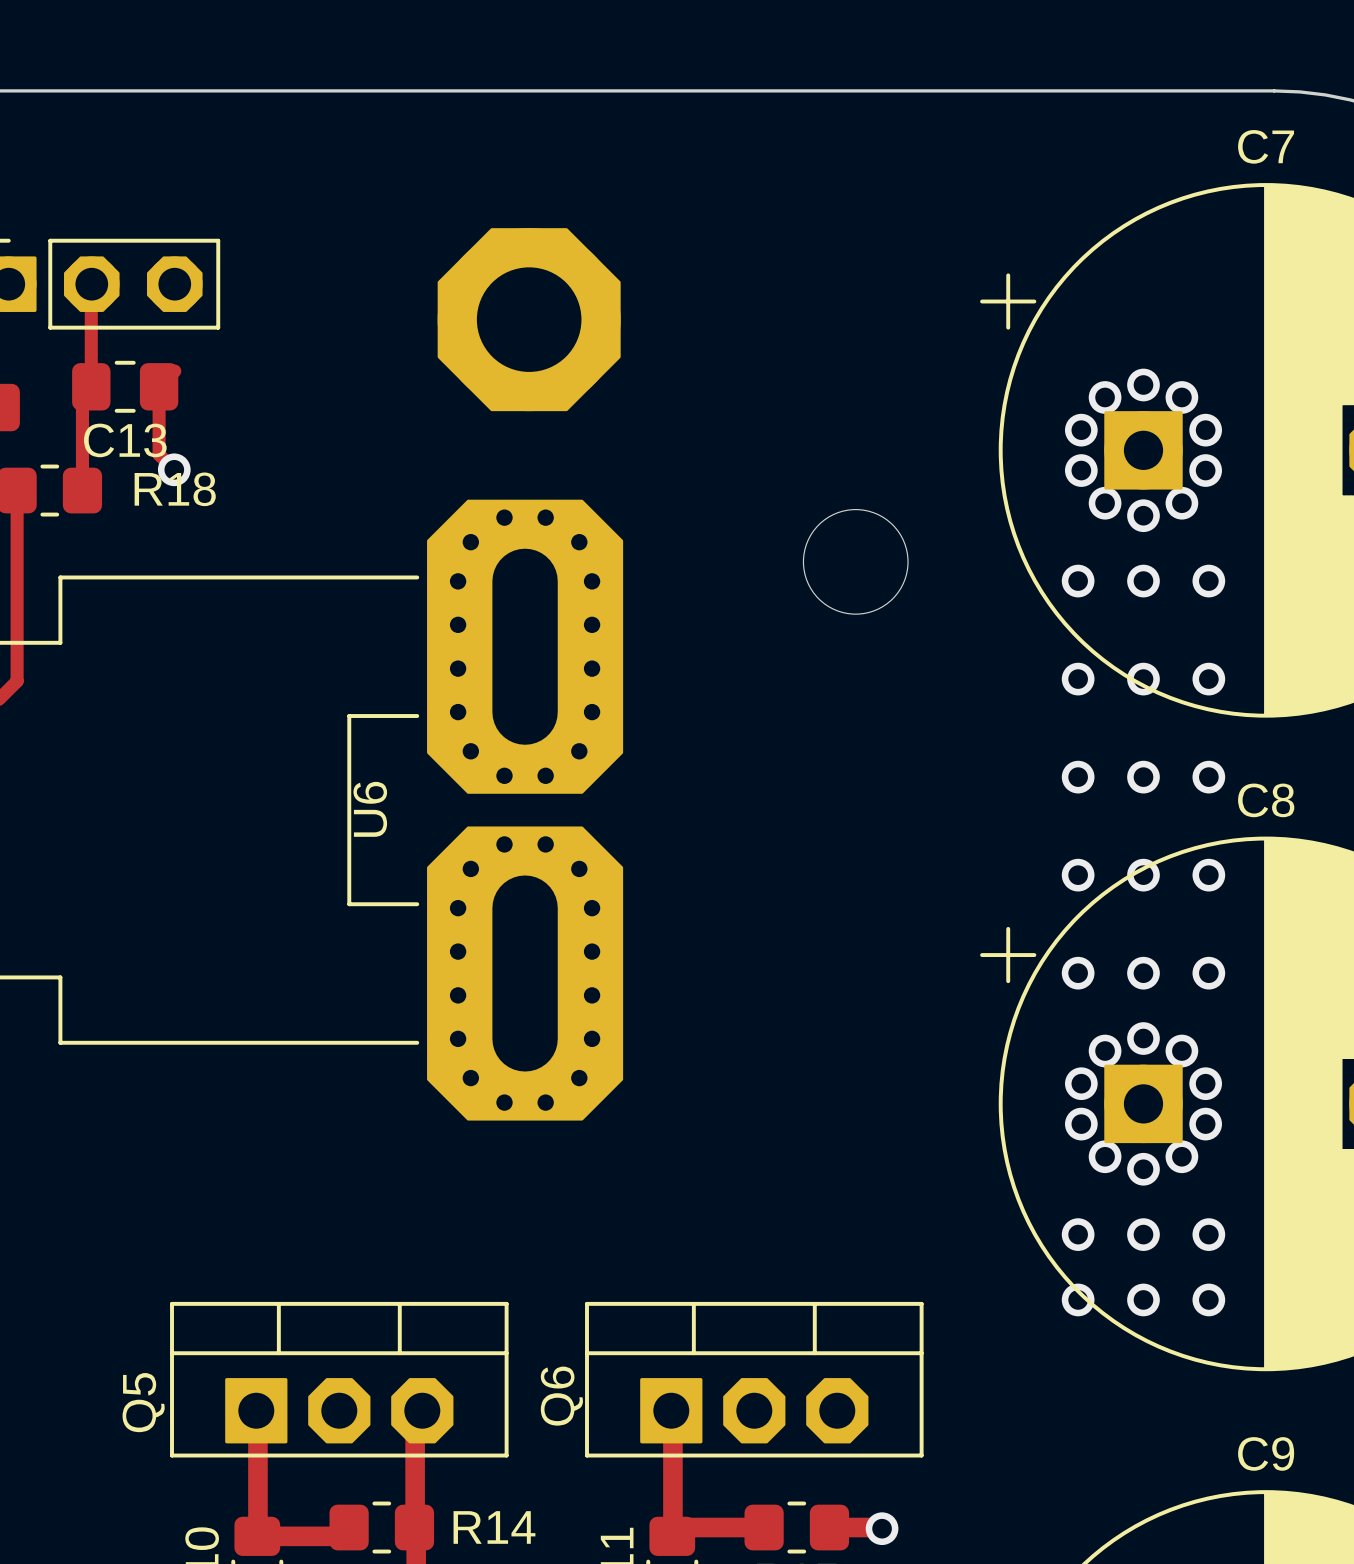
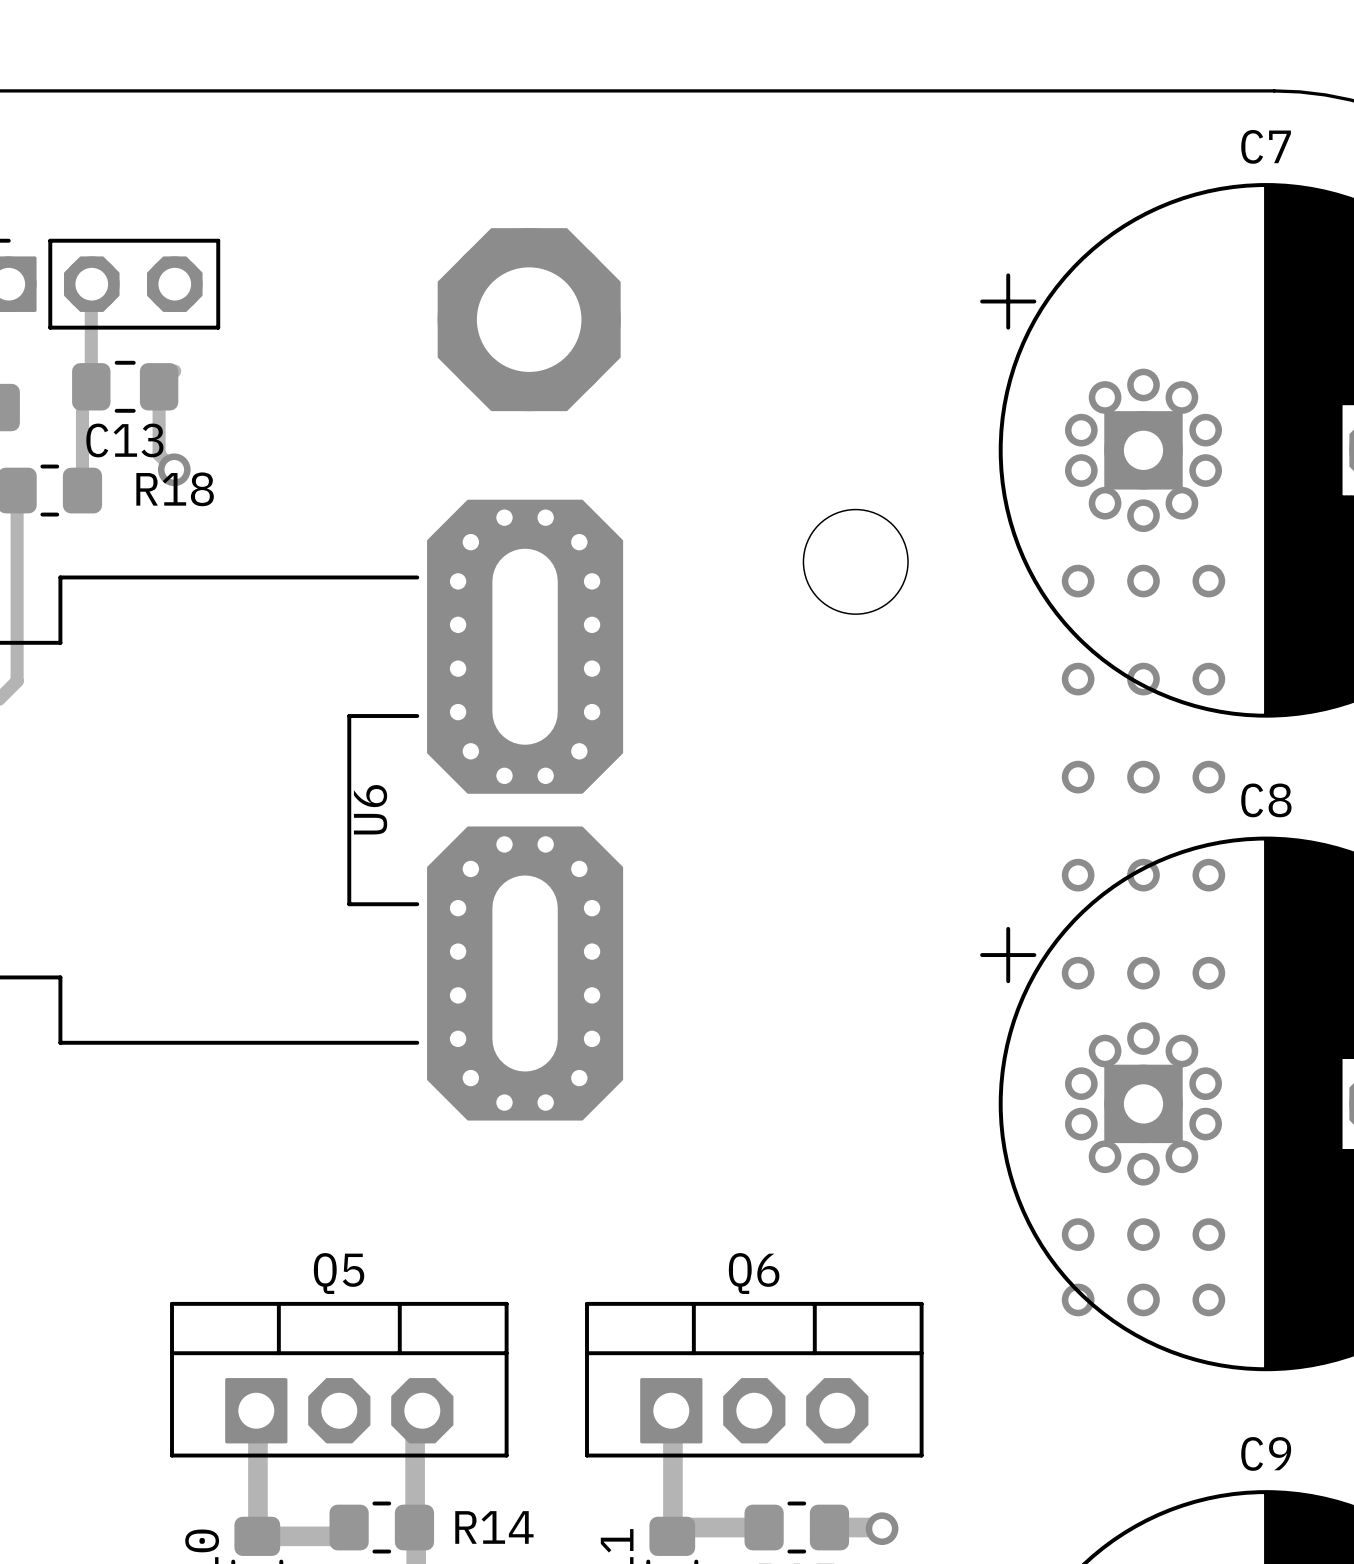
Q6 name rotation: 0° (561, 1396) -> 90° clockwise (754, 1273)
Q6 name position: Q6 (561, 1396) -> Q6 (754, 1273)
Q5 name rotation: 0° (143, 1402) -> 90° clockwise (339, 1273)
Q5 name position: Q5 (143, 1402) -> Q5 (339, 1273)

